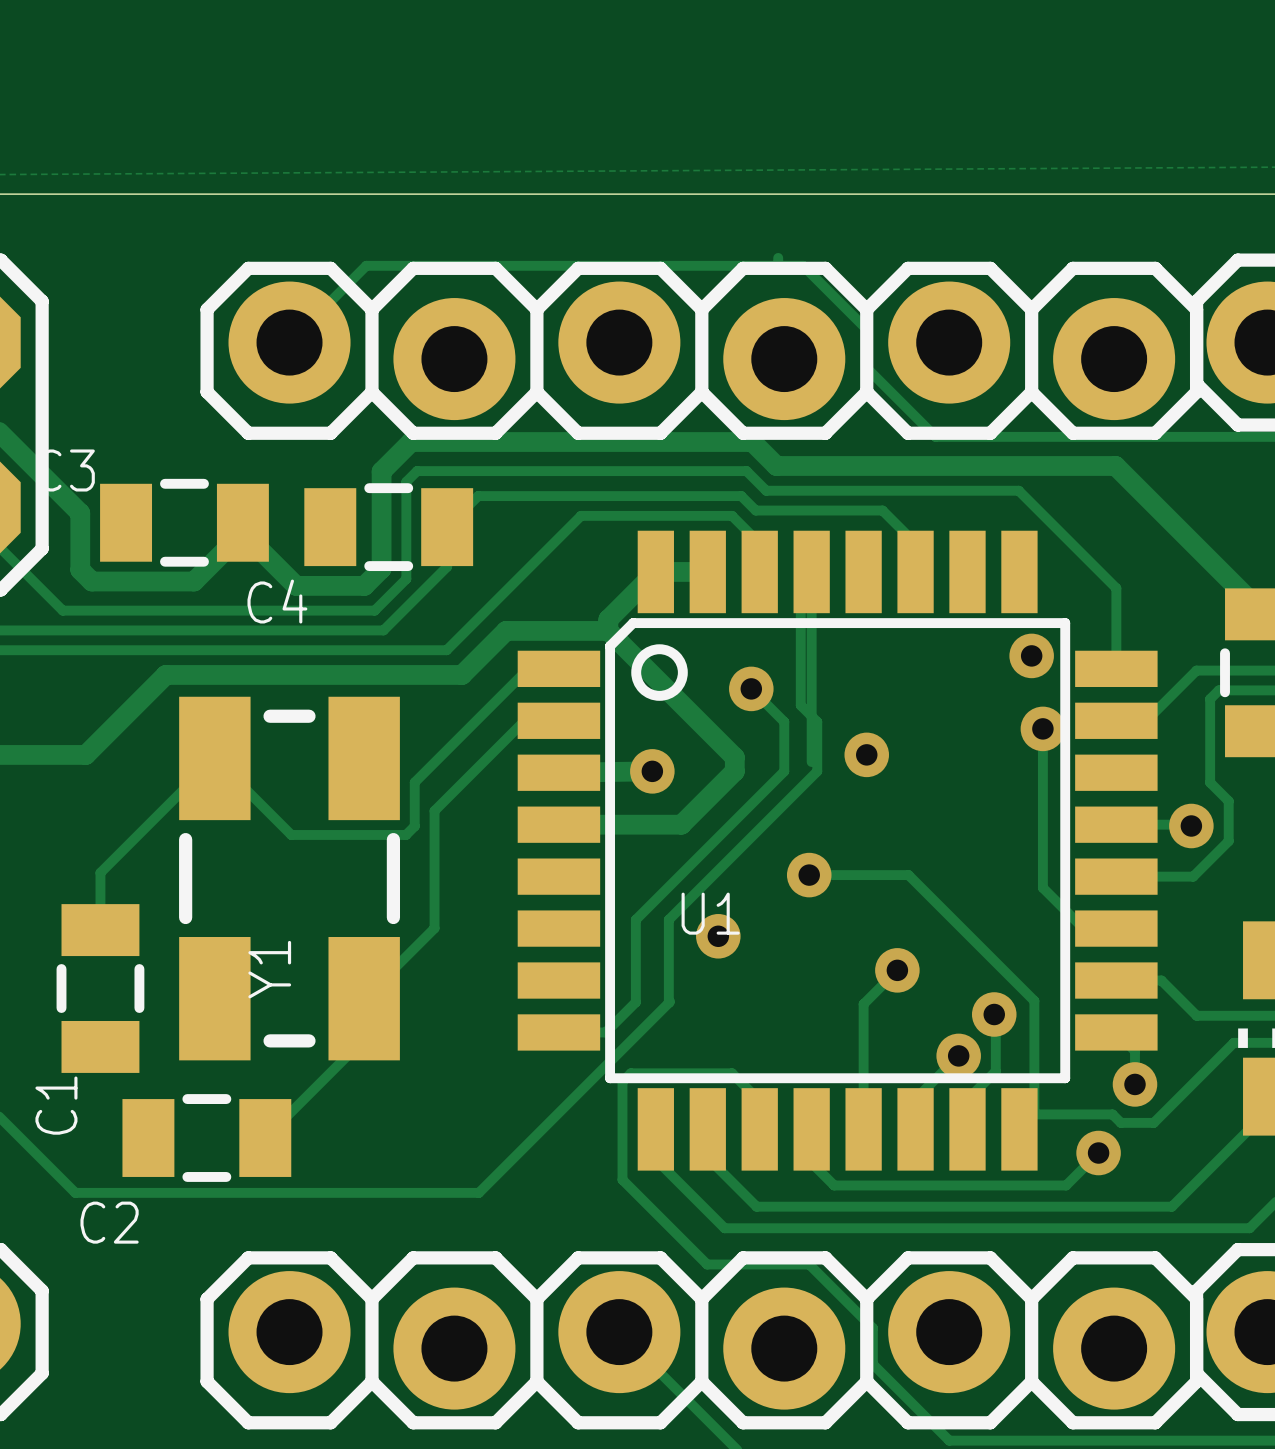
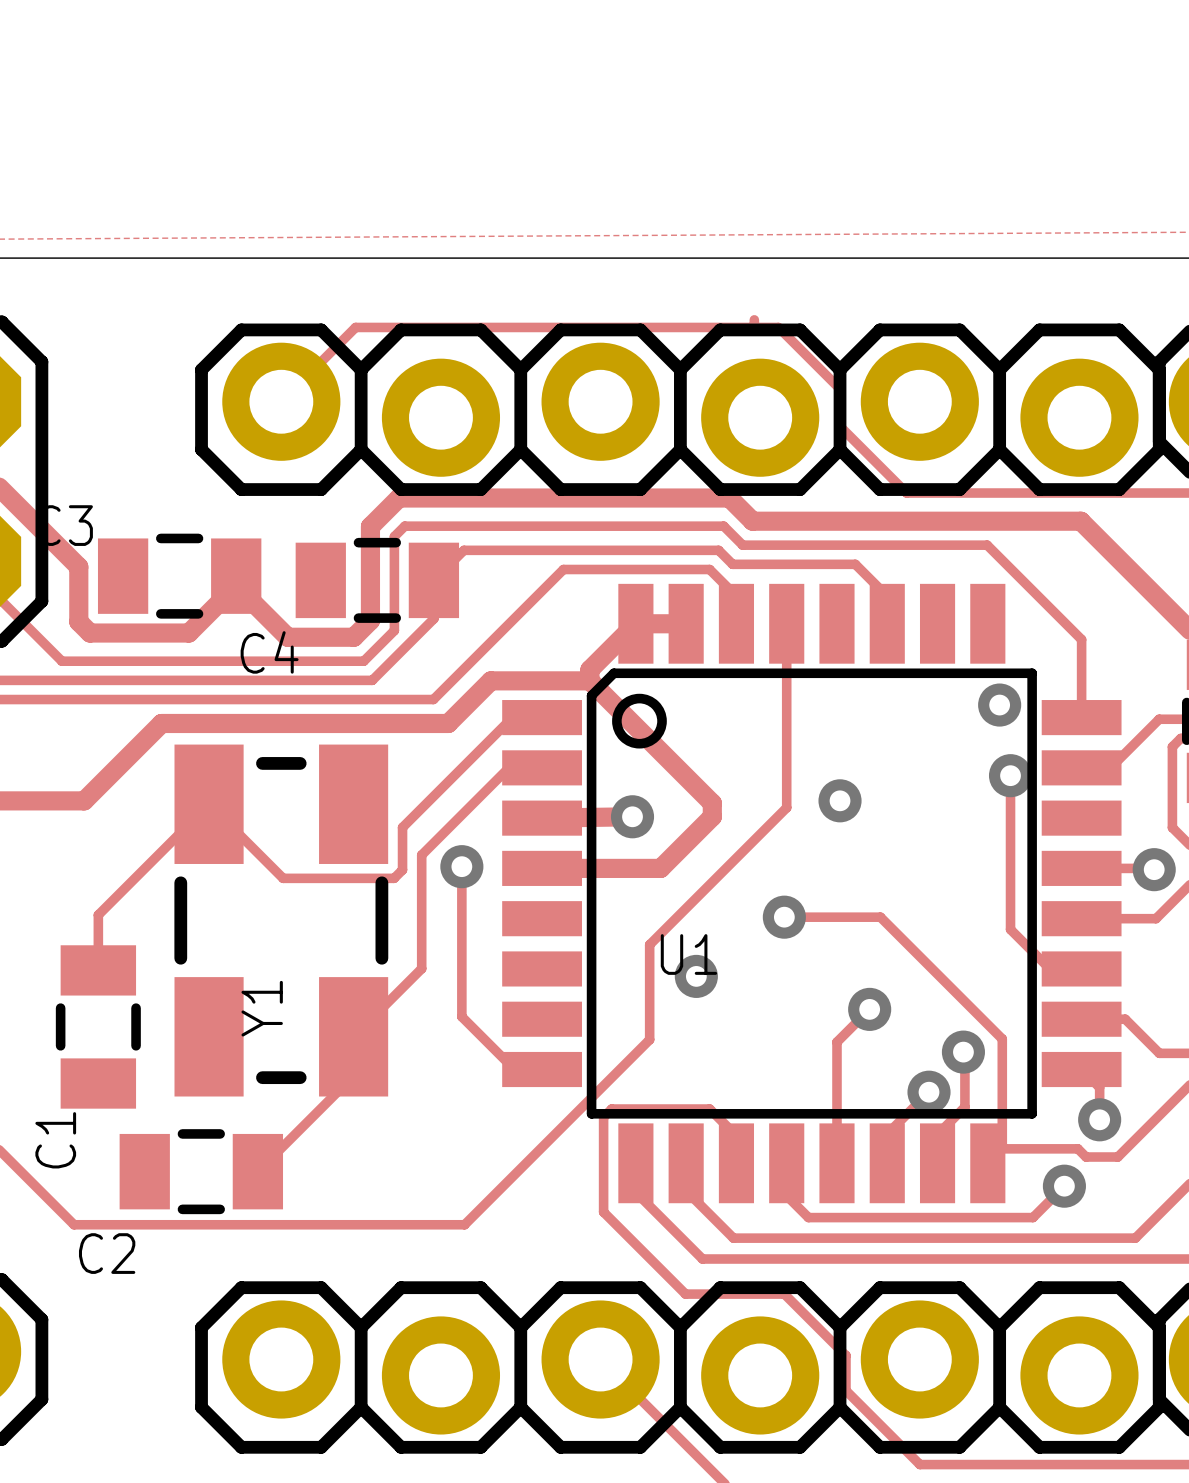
track: (811, 571) (800, 573) (800, 705) (817, 721) (817, 771) (668, 919) (668, 1002) -> (786, 807) (649, 944) (649, 1039)
track: (751, 688) (784, 721) (784, 771) (635, 919) (635, 1002) (605, 1032) (558, 1032) -> (461, 866) (461, 1016) (514, 1069) (542, 1069)
via position: (751, 688) -> (461, 866)

